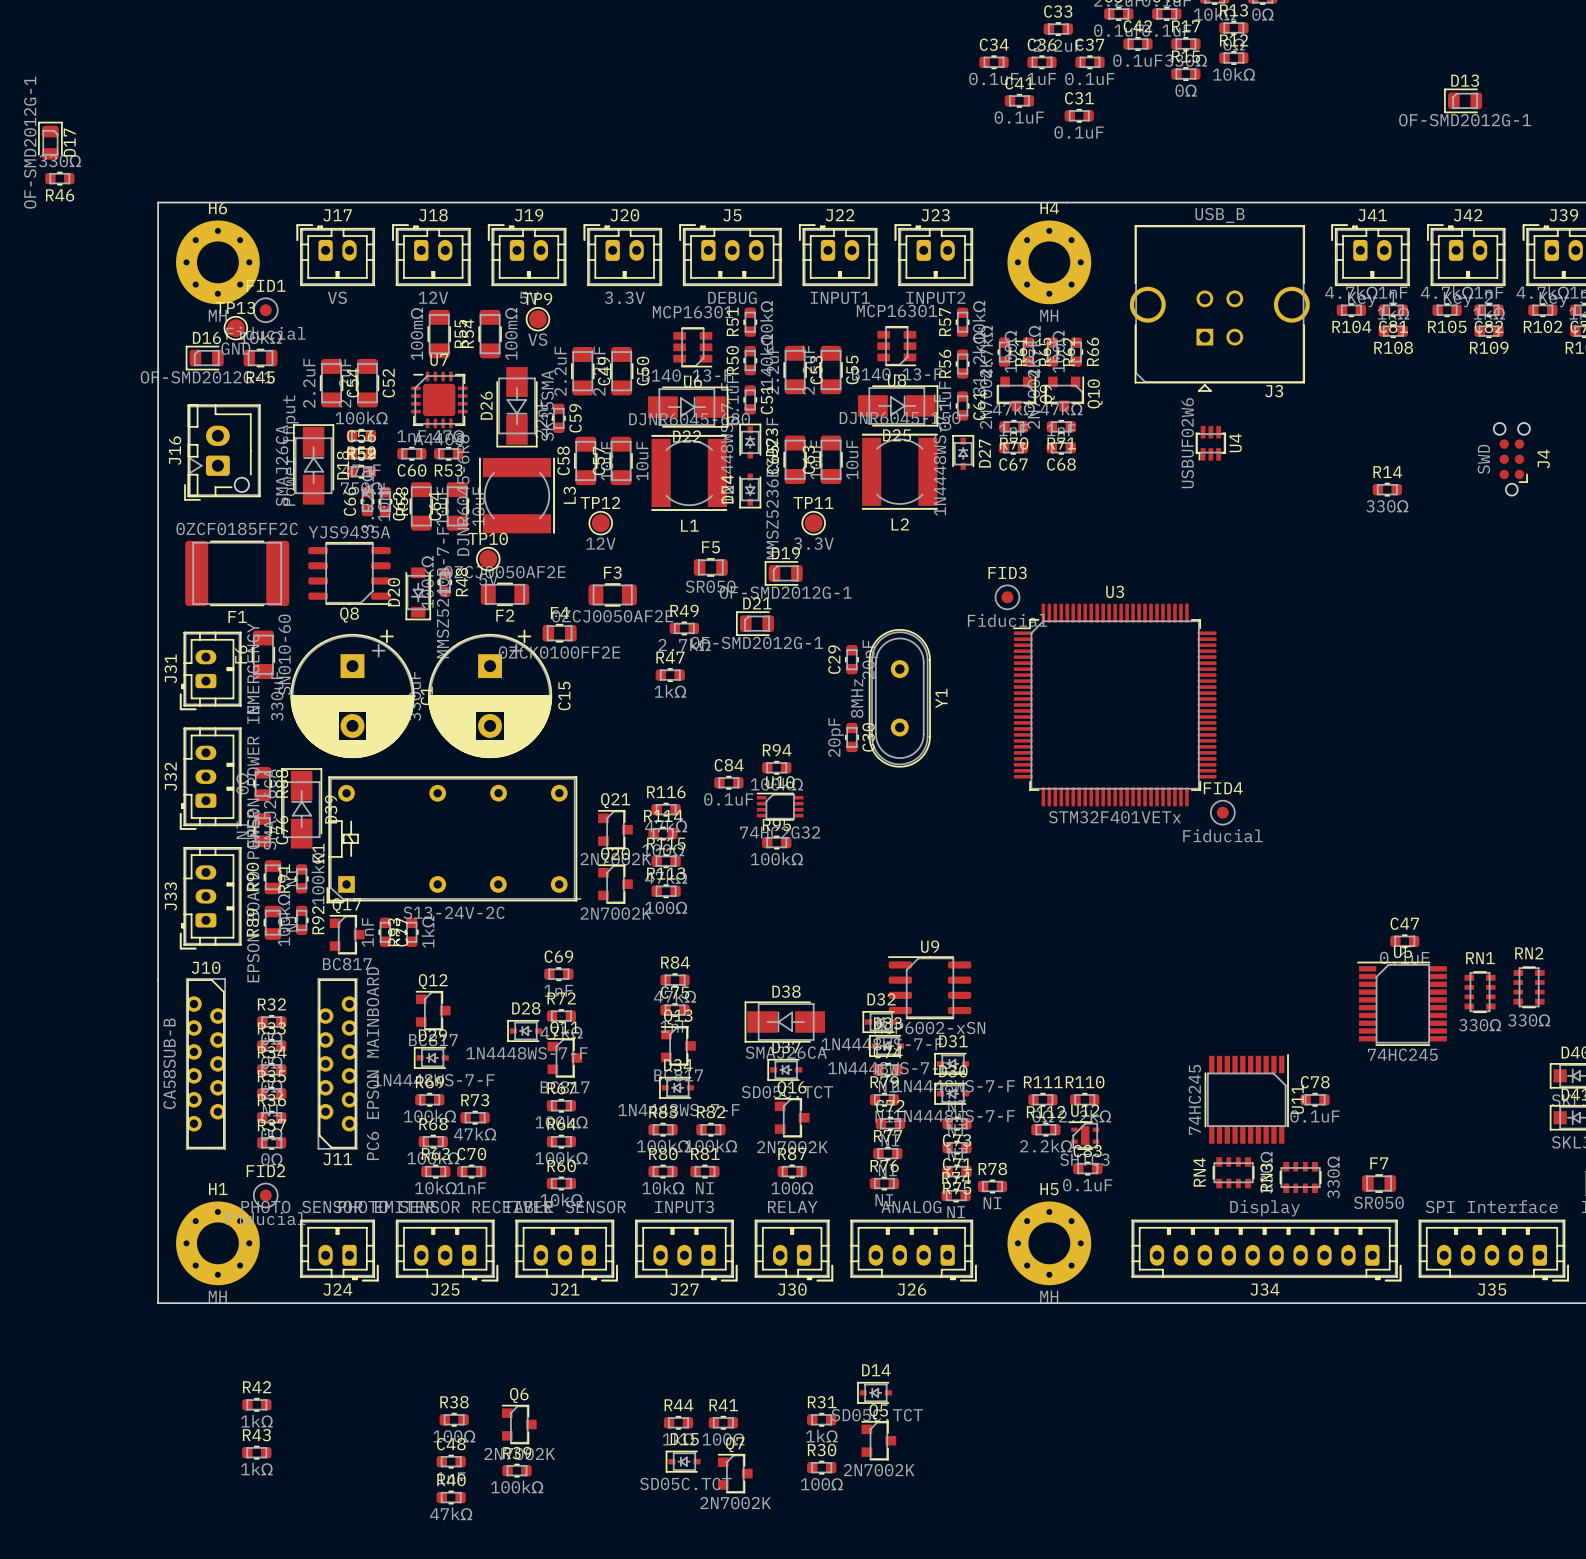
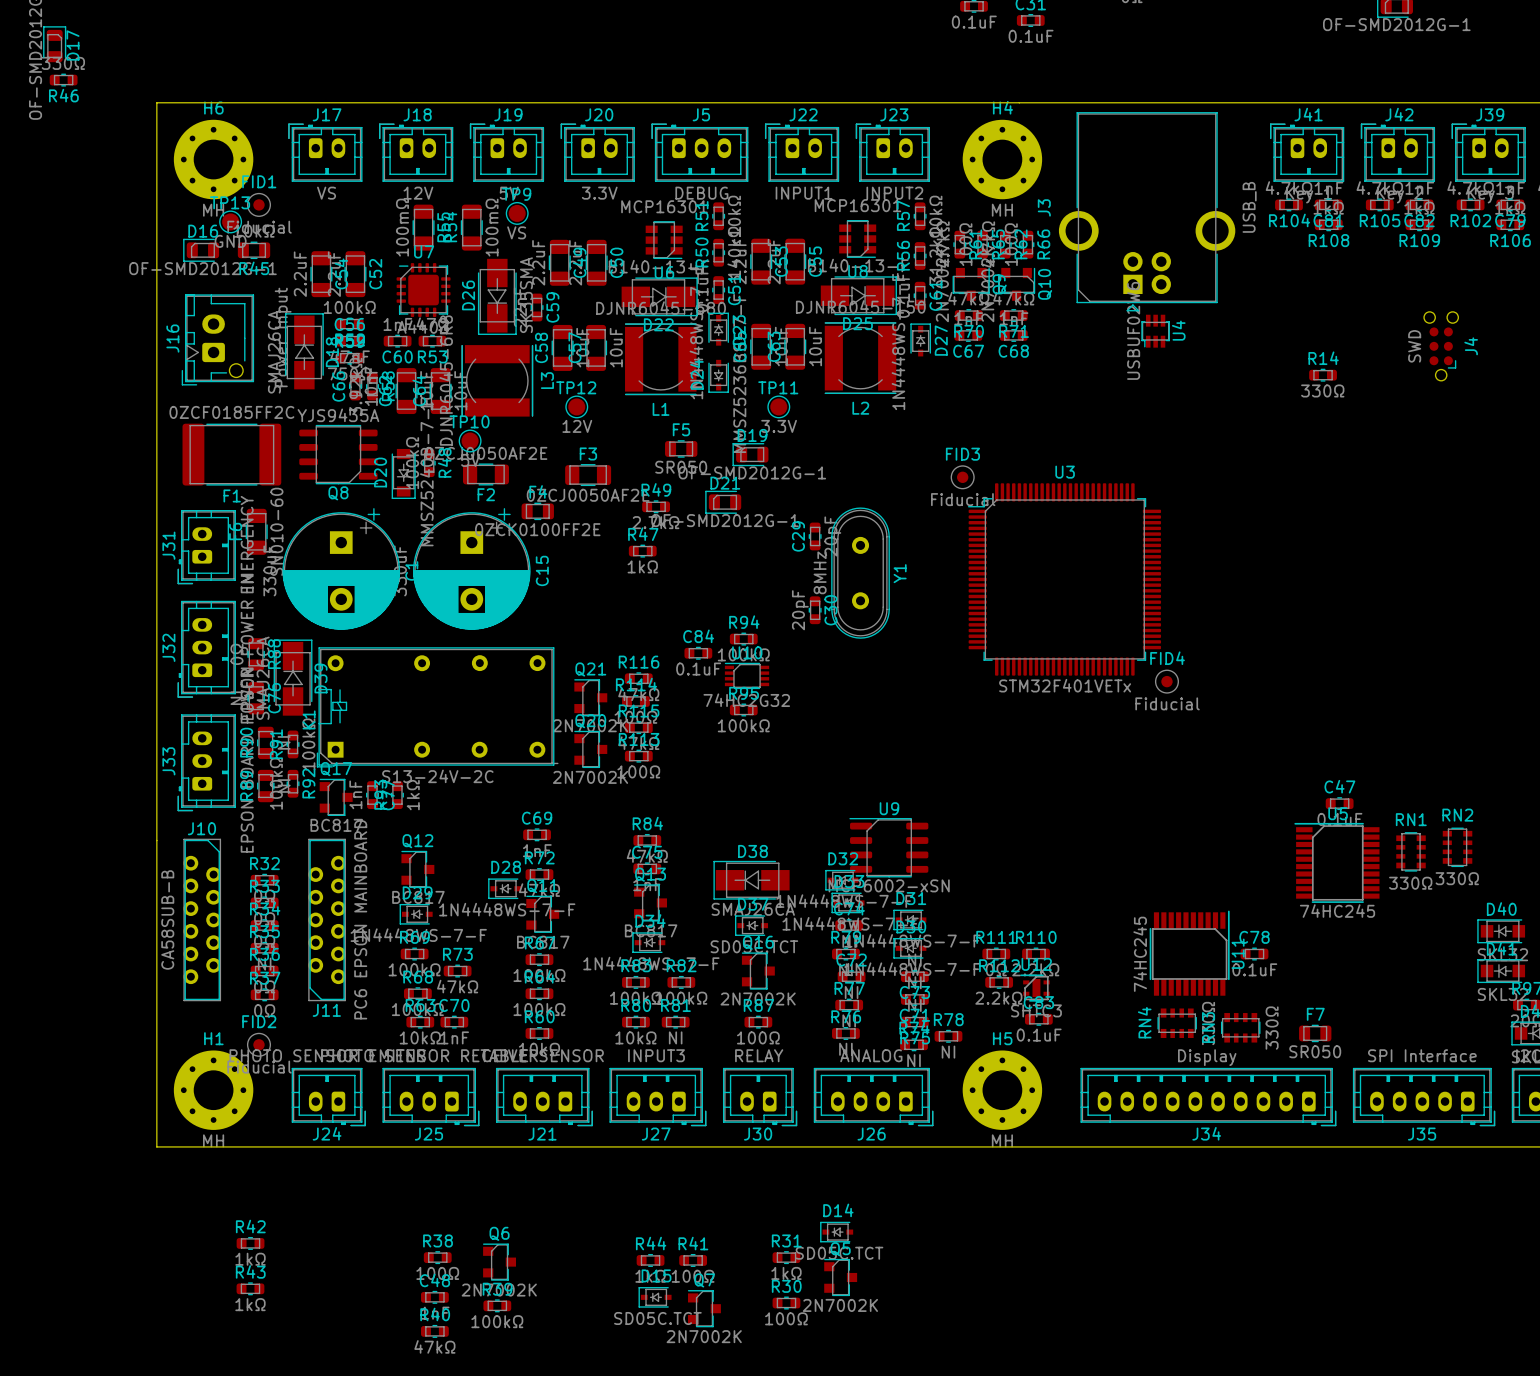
J3 value position: USB_B (1220, 215) -> USB_B (1249, 207)
J3 footprint: [1129, 225, 1310, 392] -> [1058, 112, 1236, 312]
J3 name position: J3 (1274, 391) -> J3 (1044, 207)

